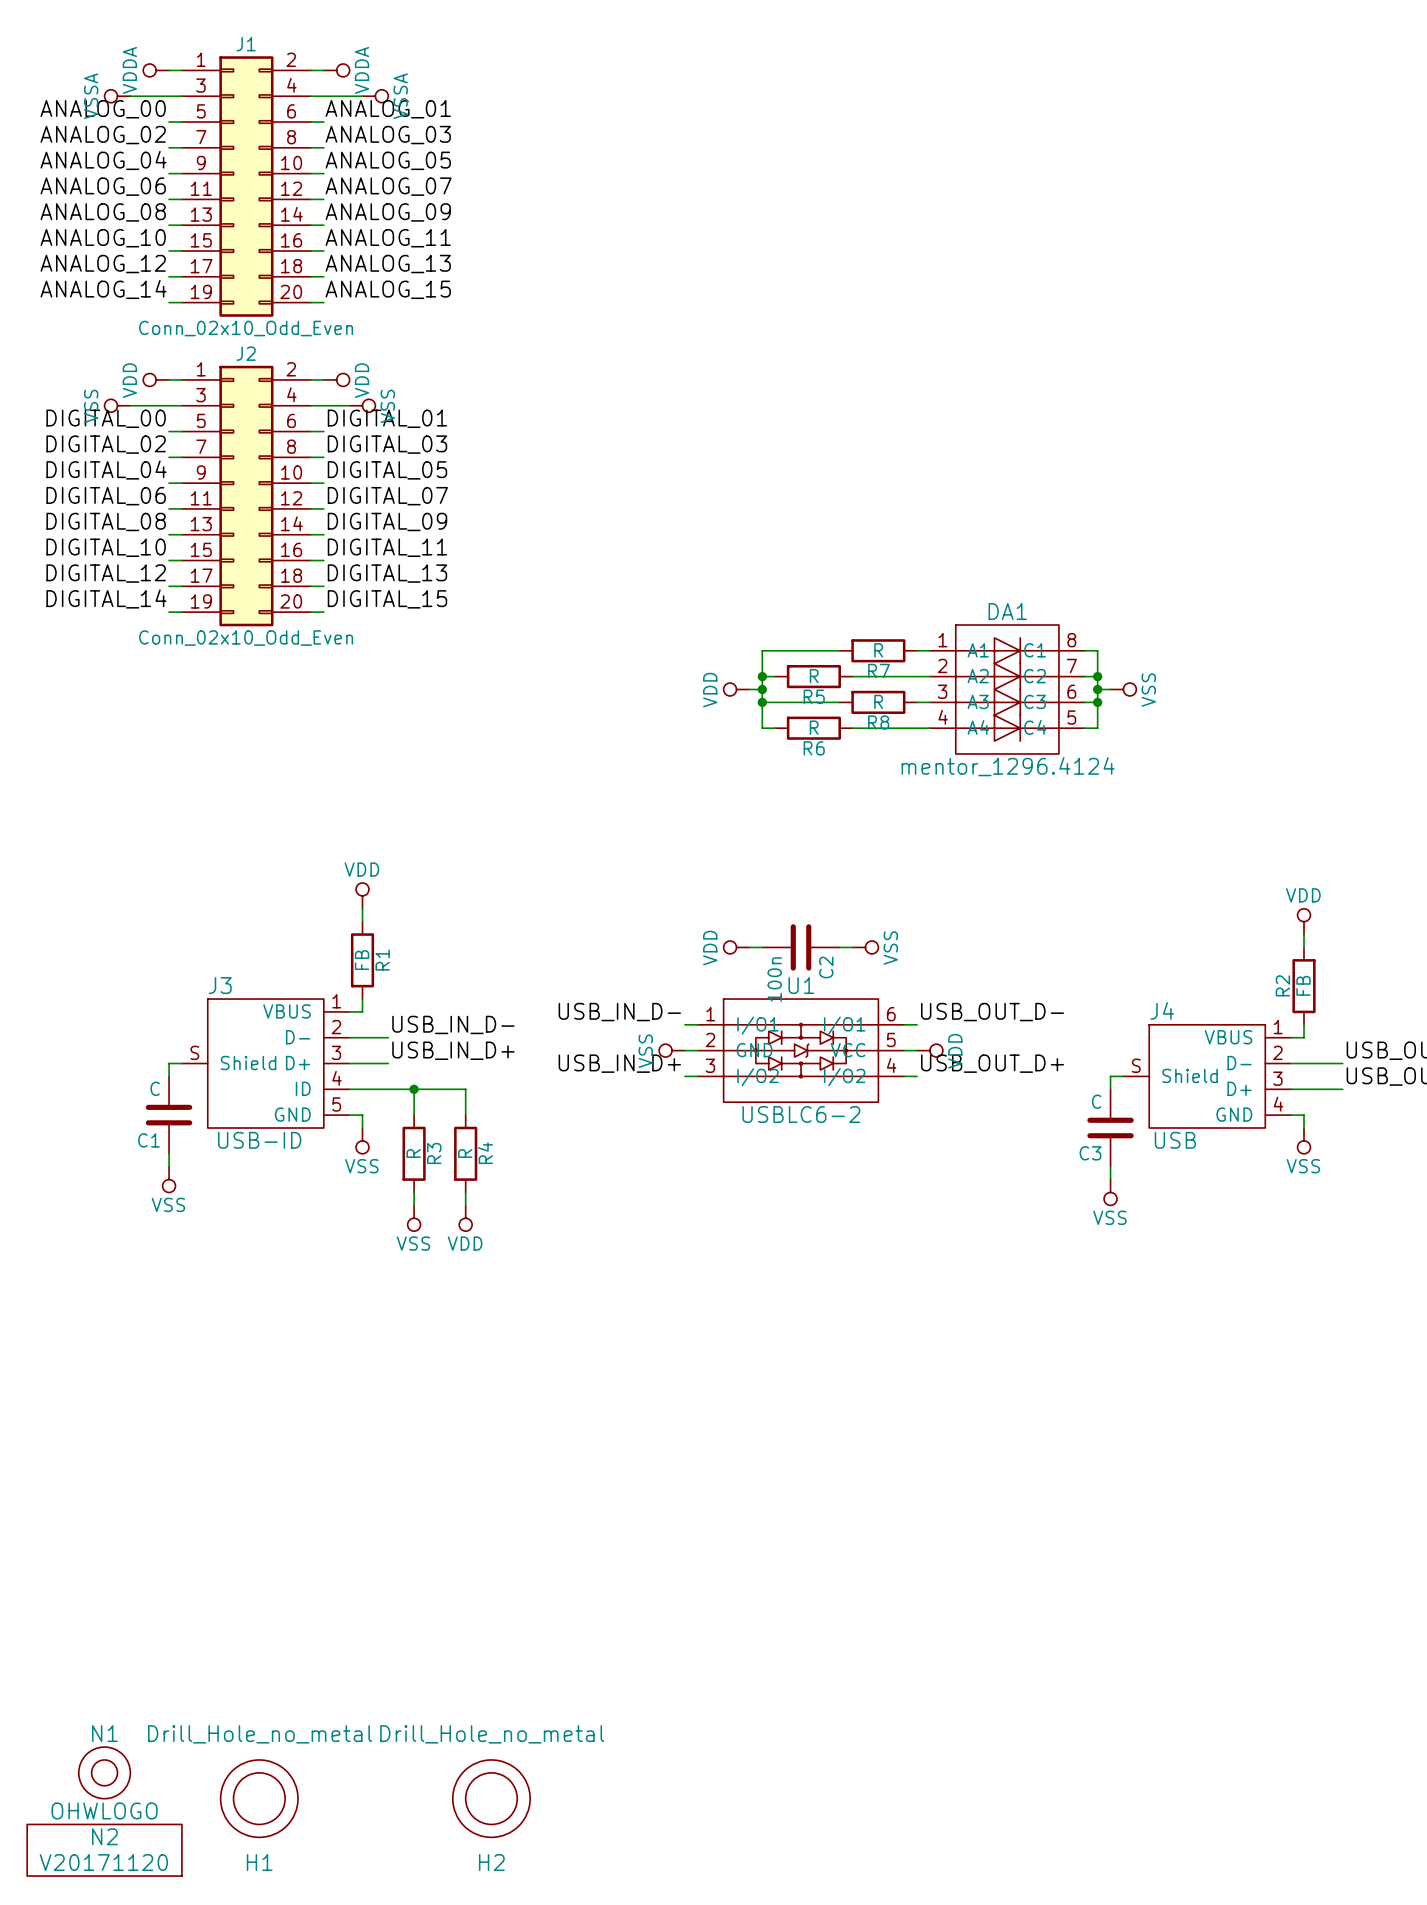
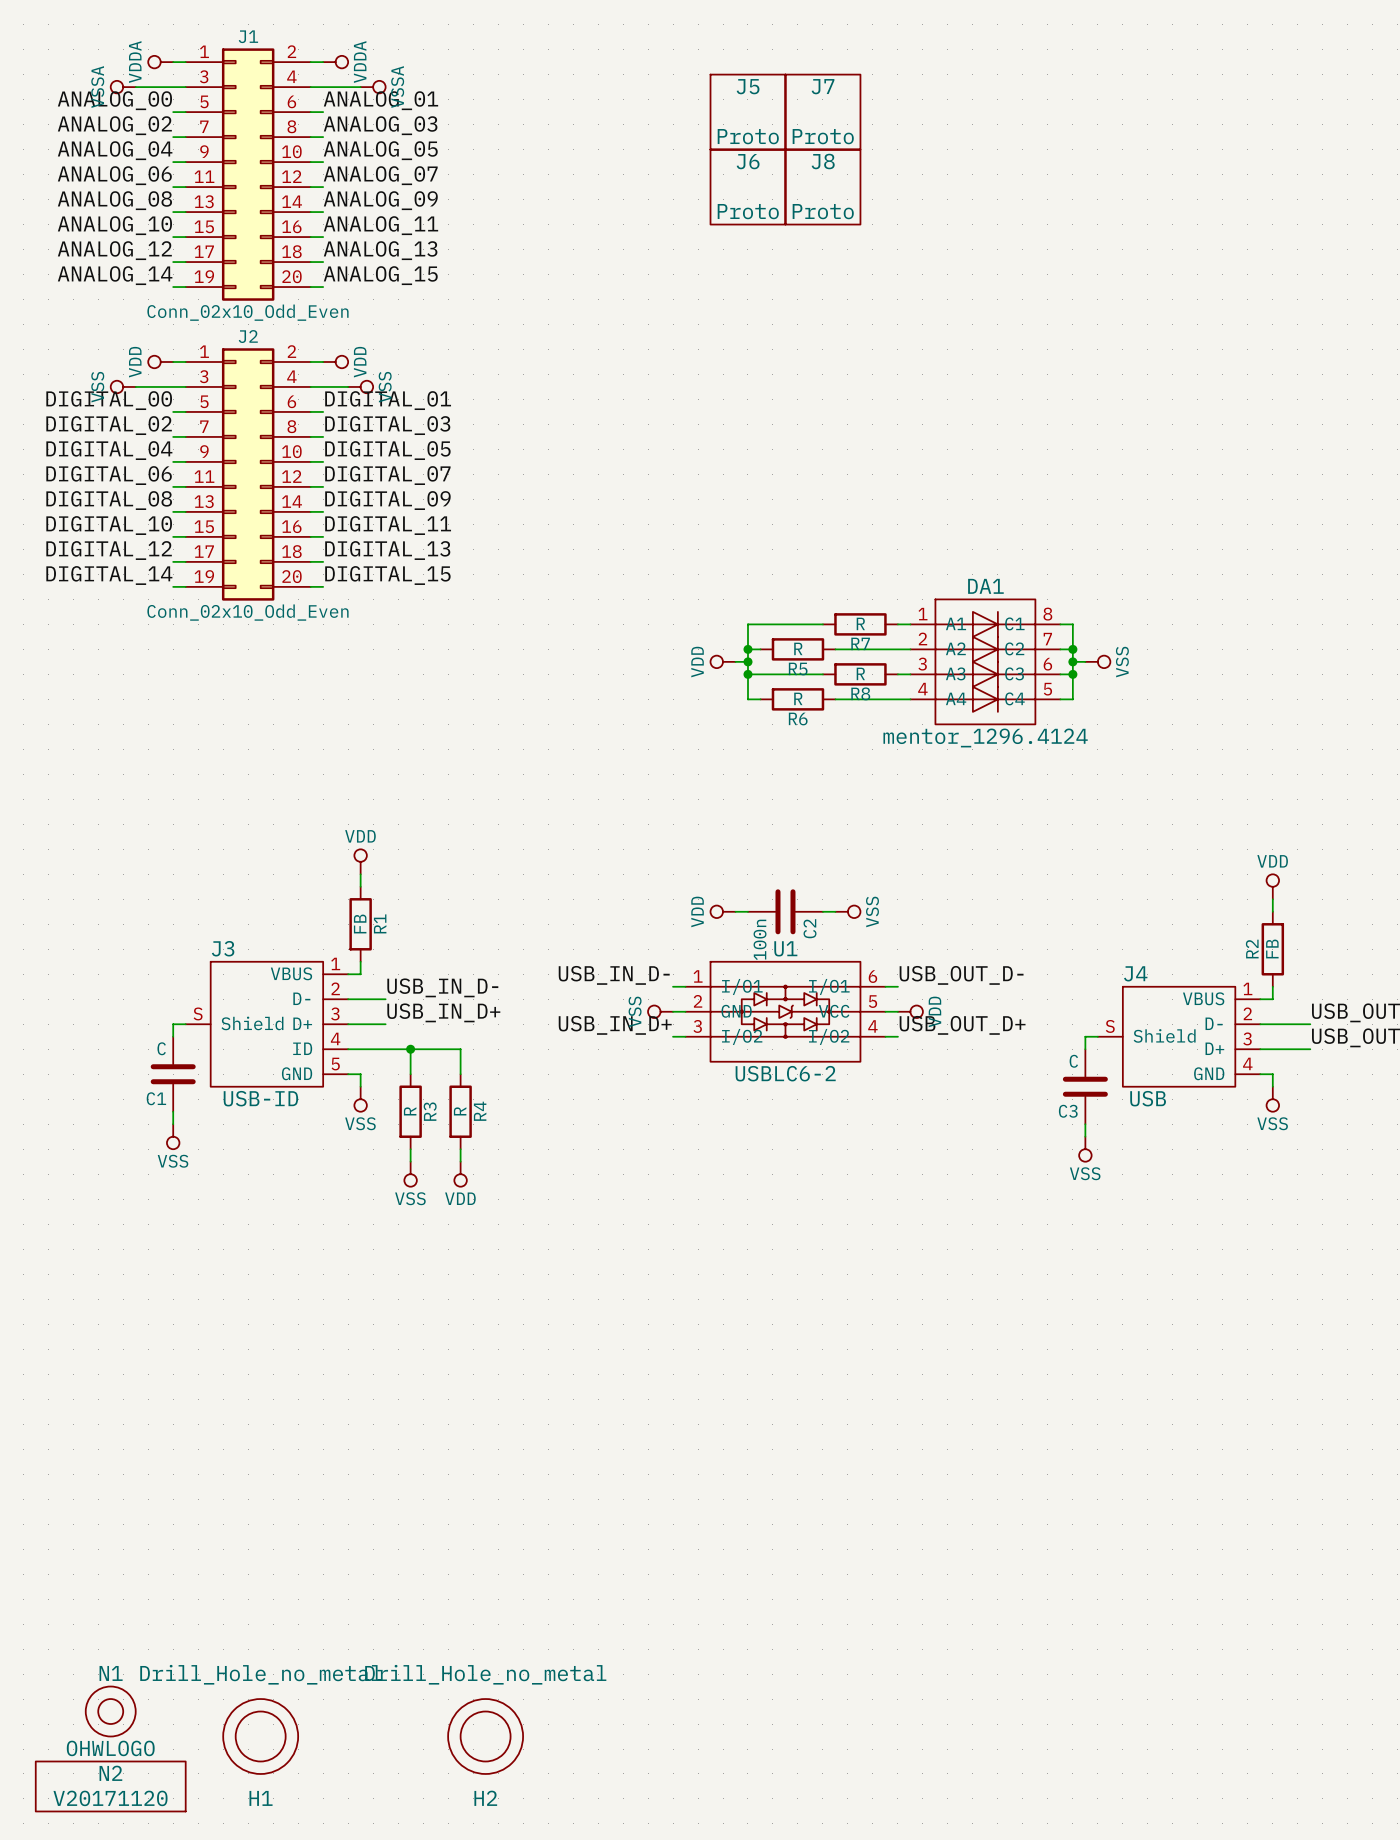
J5: none -> Proto (747, 112)
J7: none -> Proto (822, 112)
J6: none -> Proto (747, 187)
J8: none -> Proto (822, 187)

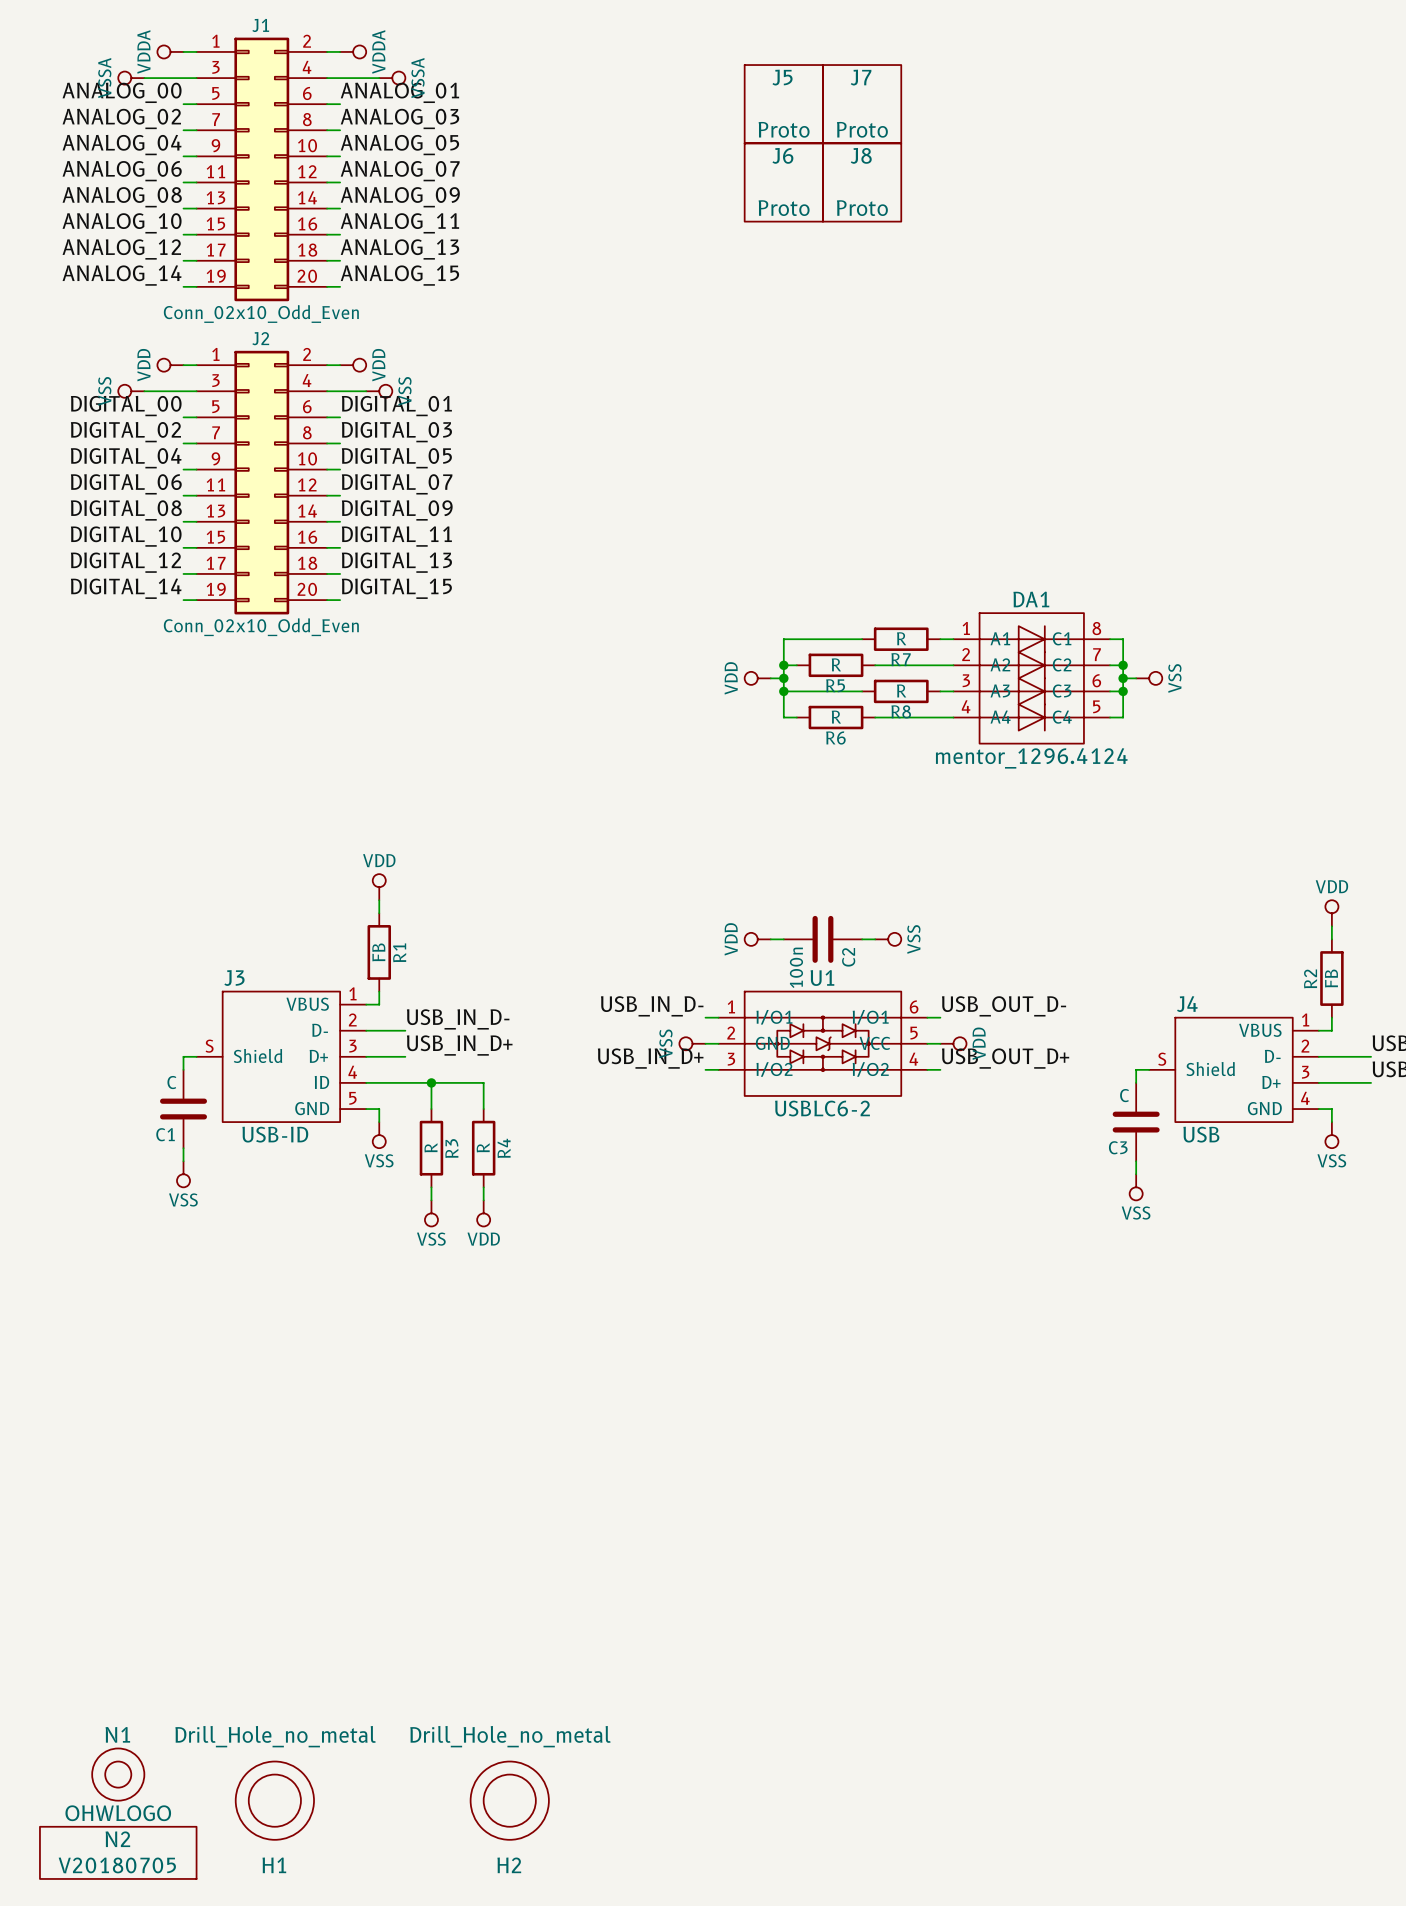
N2 value: V20171120 (110, 1798) -> V20180705 (117, 1865)

